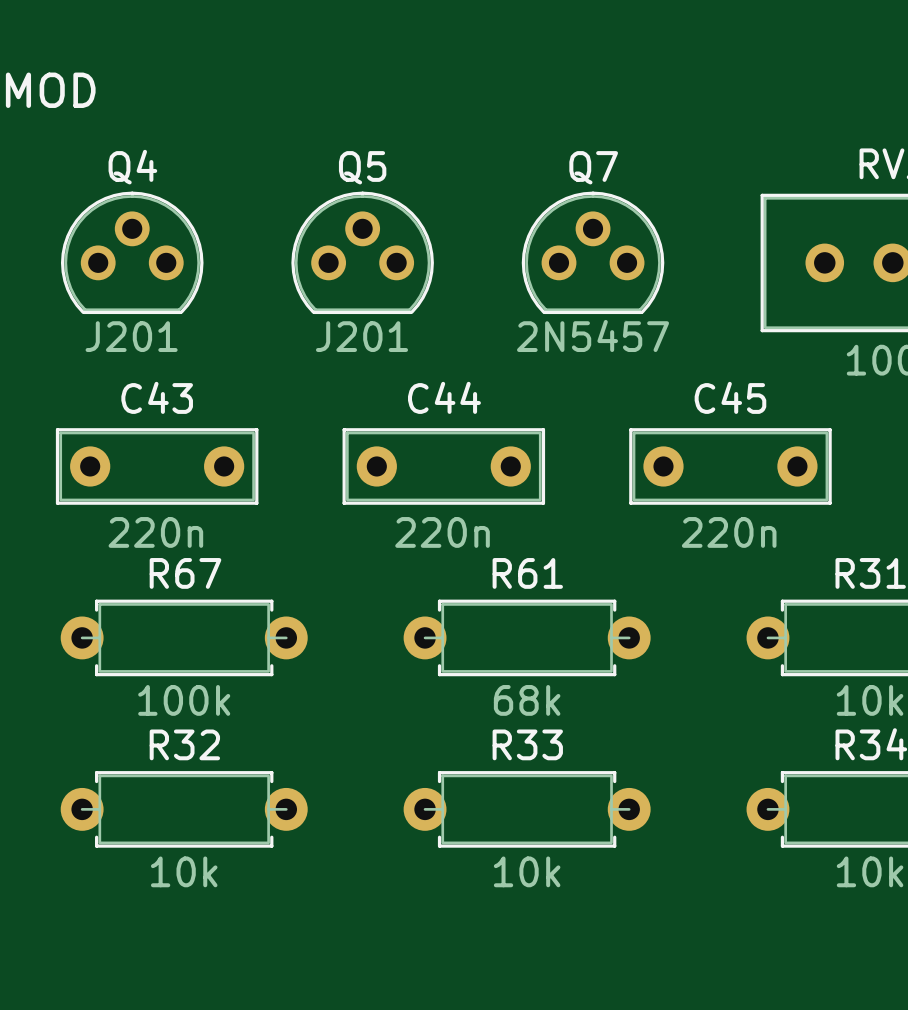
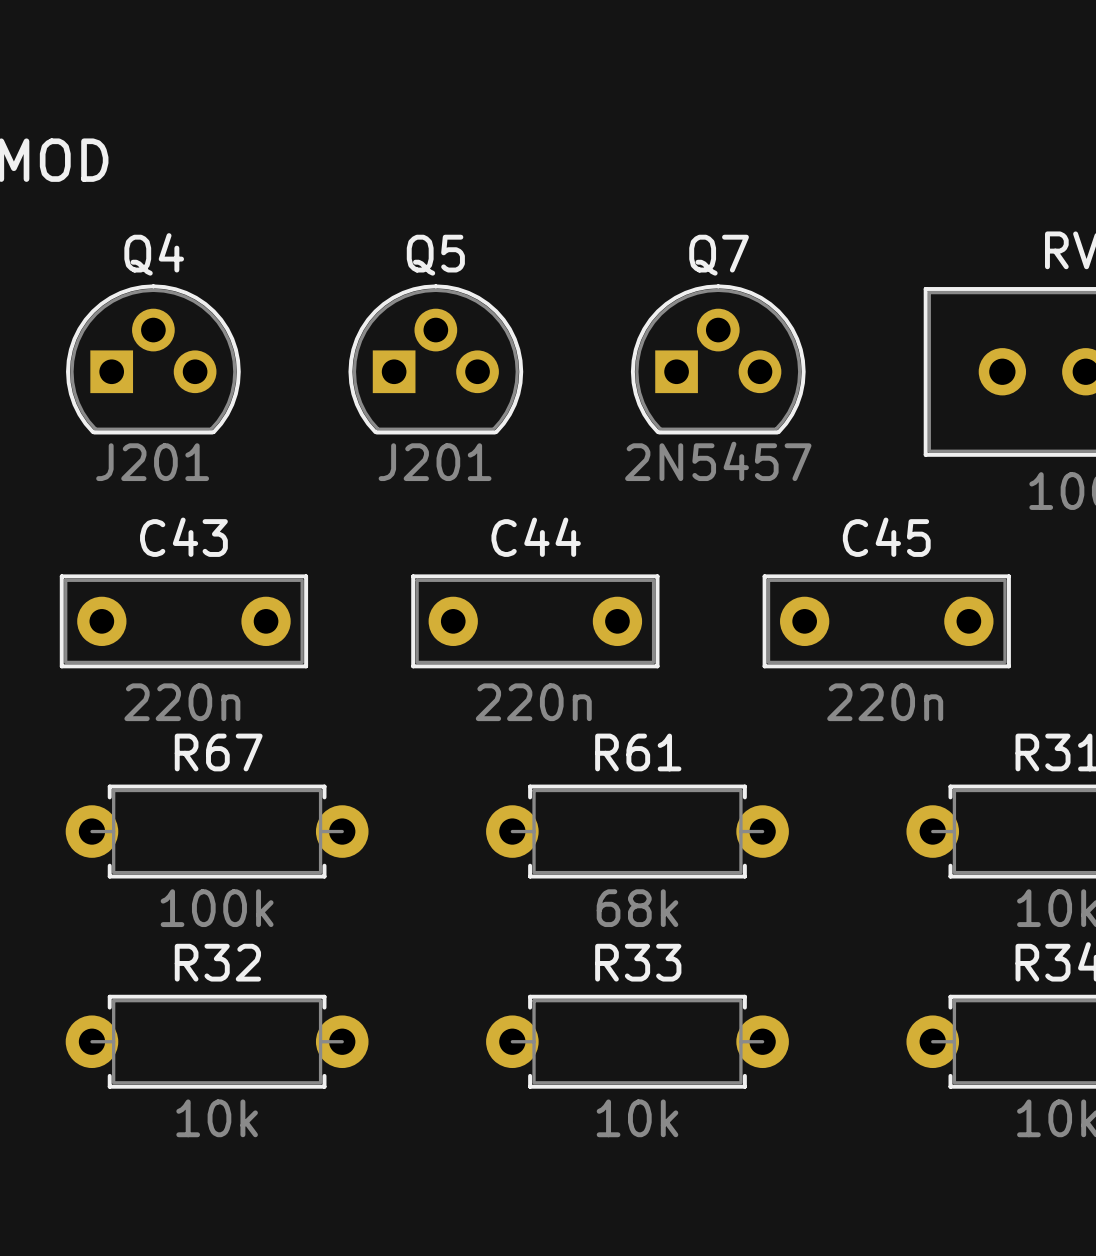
Q4 footprint: [60, 191, 204, 315] -> [66, 284, 241, 435]
Q5 footprint: [291, 191, 434, 315] -> [348, 284, 524, 435]
Q7 footprint: [521, 191, 665, 315] -> [630, 284, 806, 435]

